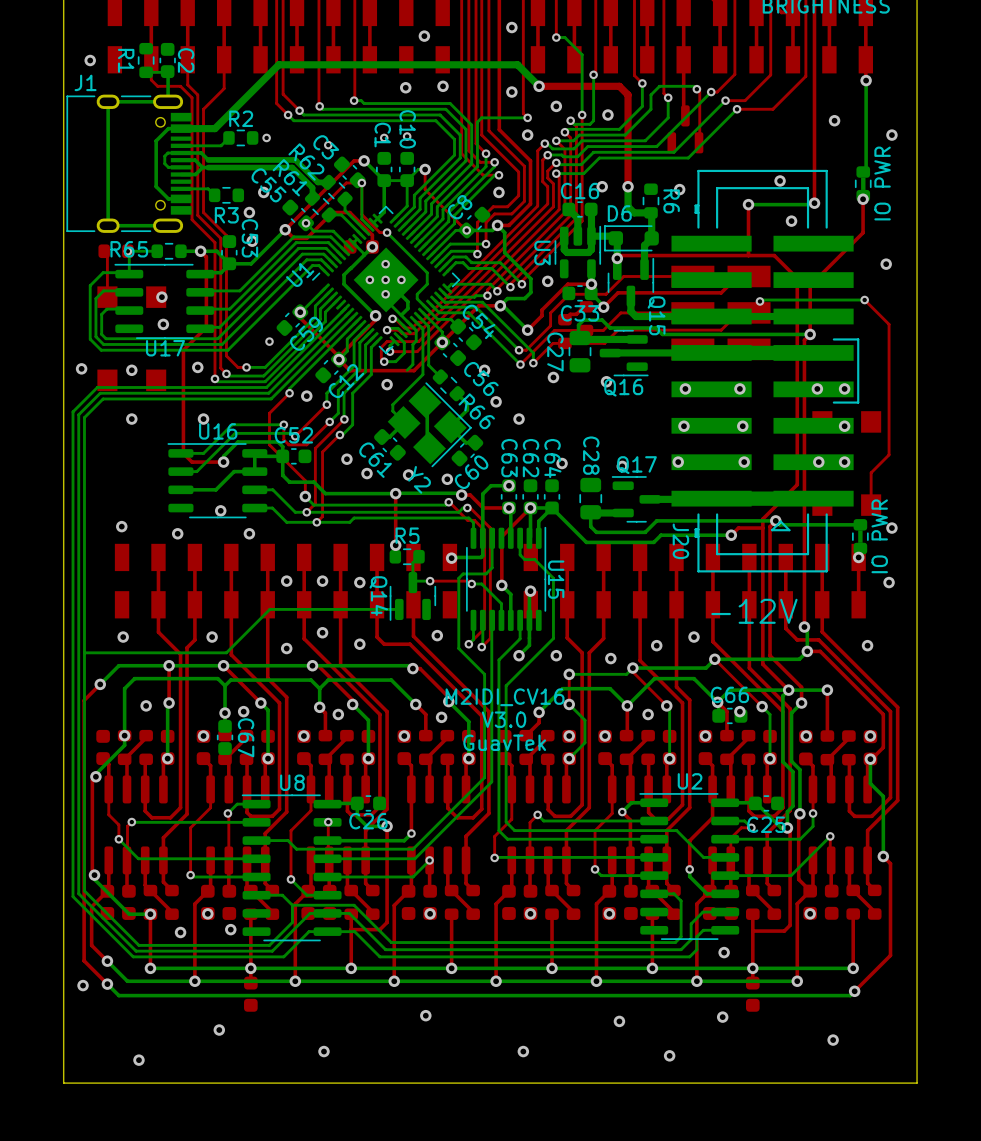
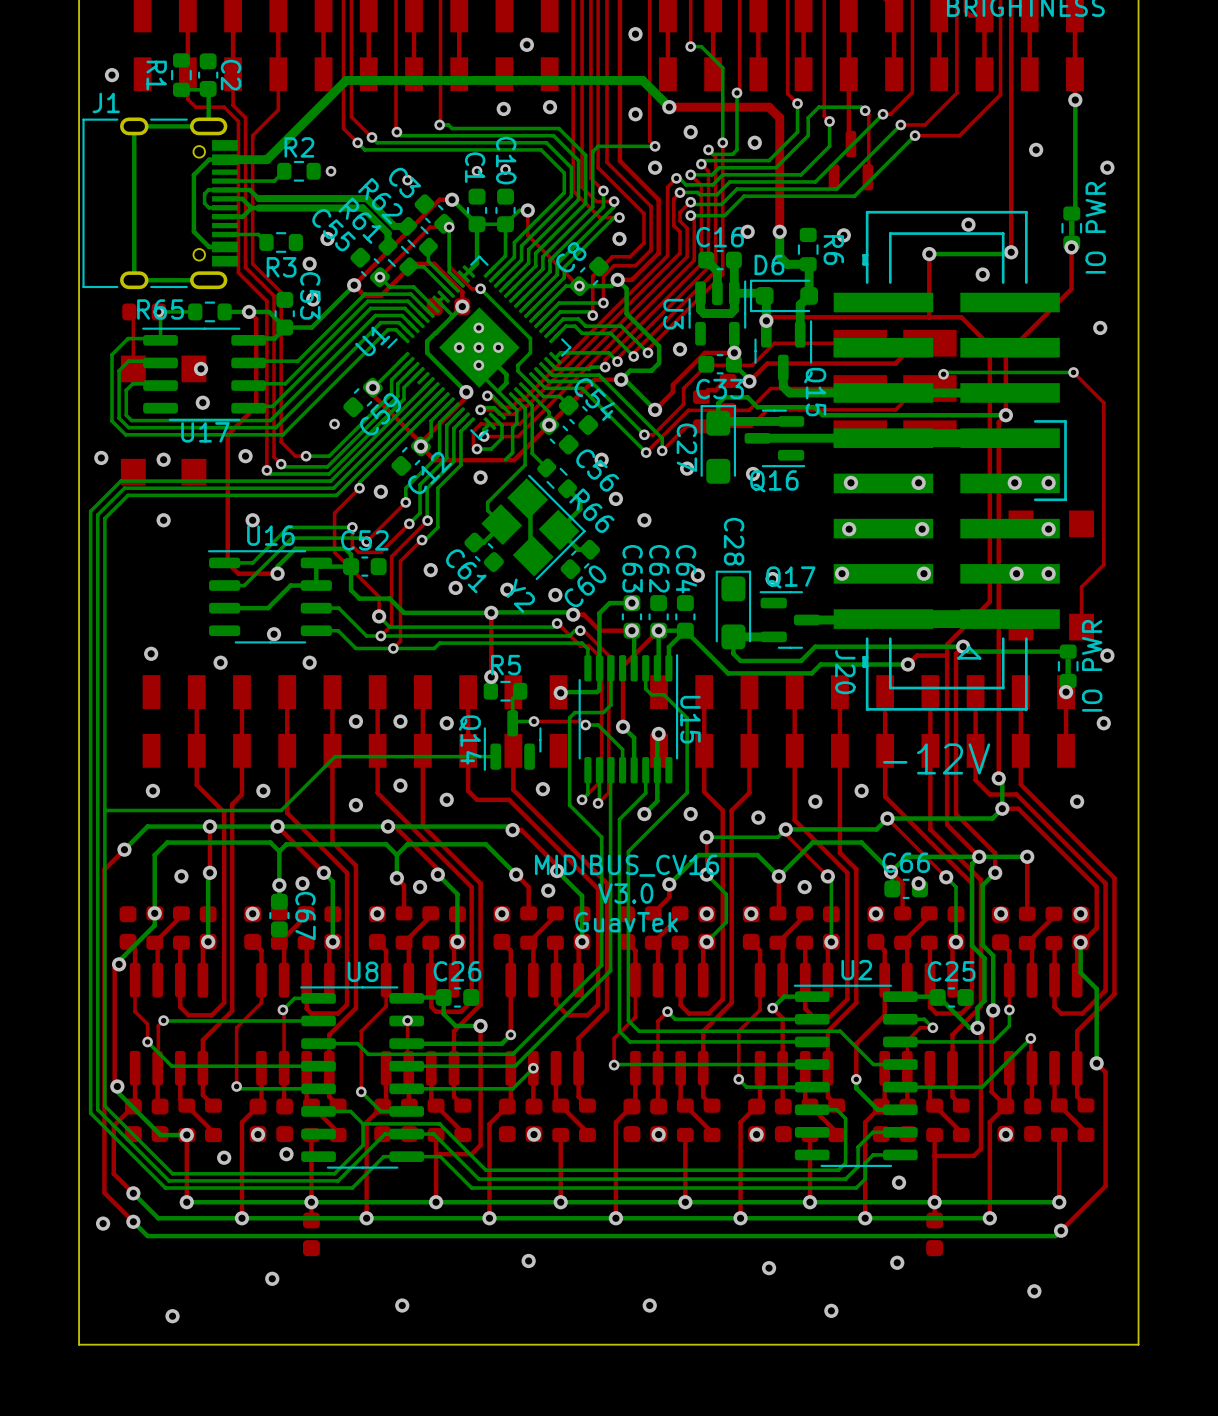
C27 footprint: [568, 330, 592, 373] -> [700, 405, 737, 484]
C28 footprint: [579, 477, 603, 520] -> [715, 570, 752, 650]
text: M2IDI_CV16 (505, 697) -> MIDIBUS_CV16 (627, 865)
C26 name position: C26 (368, 821) -> C26 (457, 971)
C25 name position: C25 (766, 824) -> C25 (951, 971)

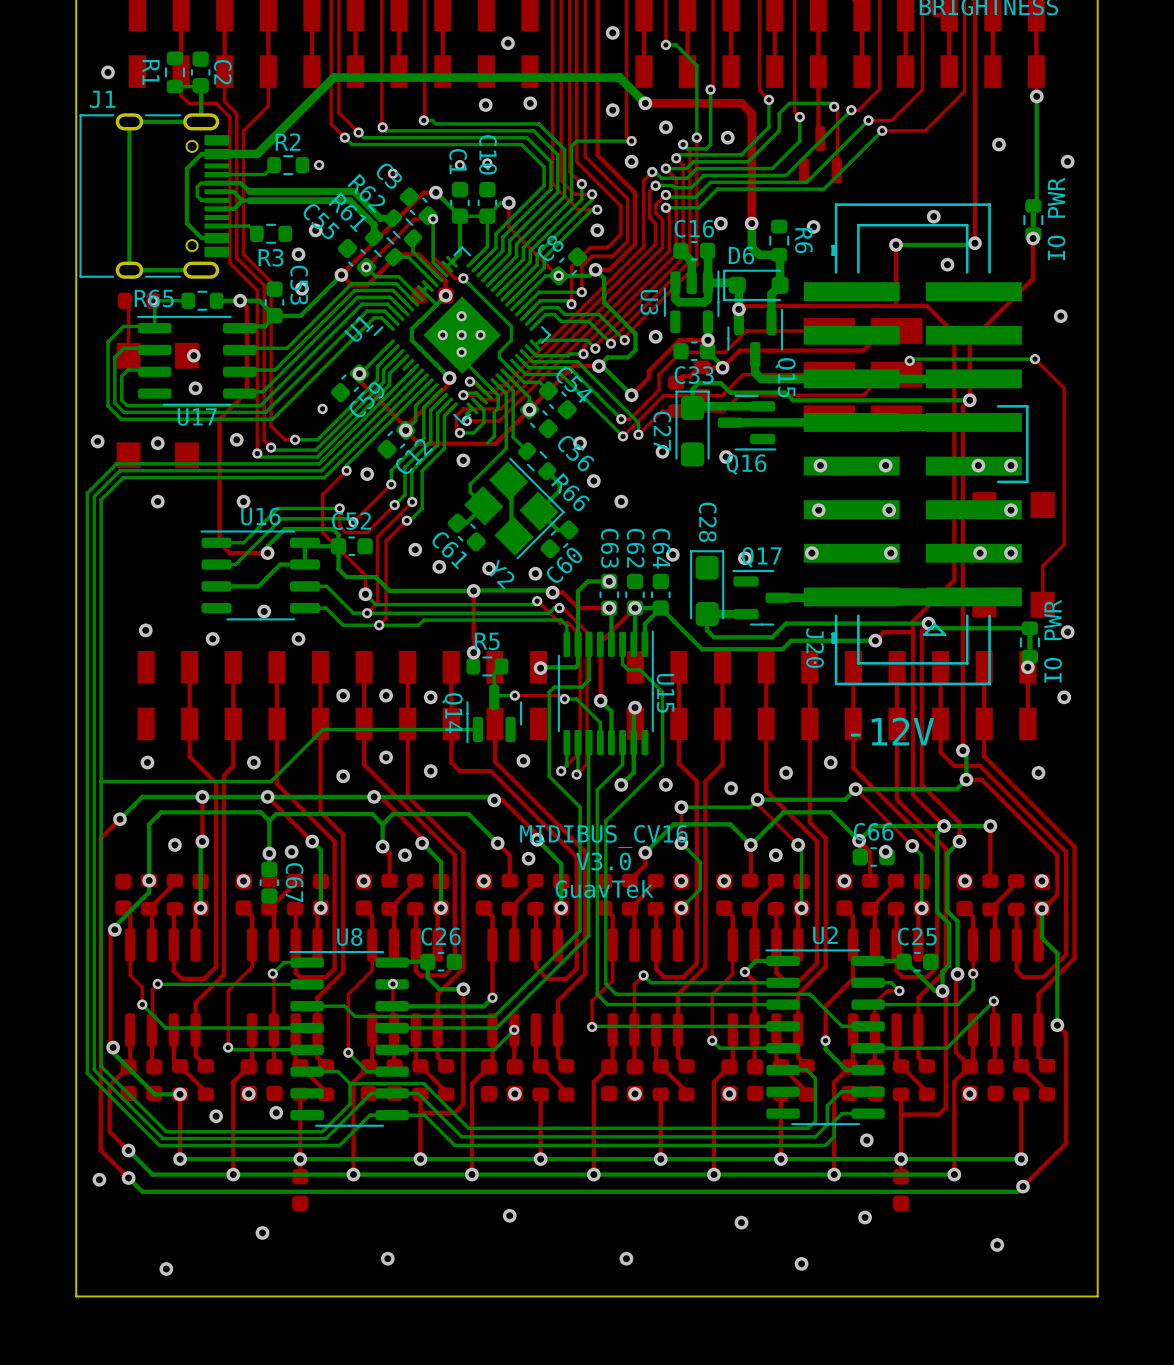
bottom track: (479, 347) (506, 374) (506, 383) (498, 391) -> none

